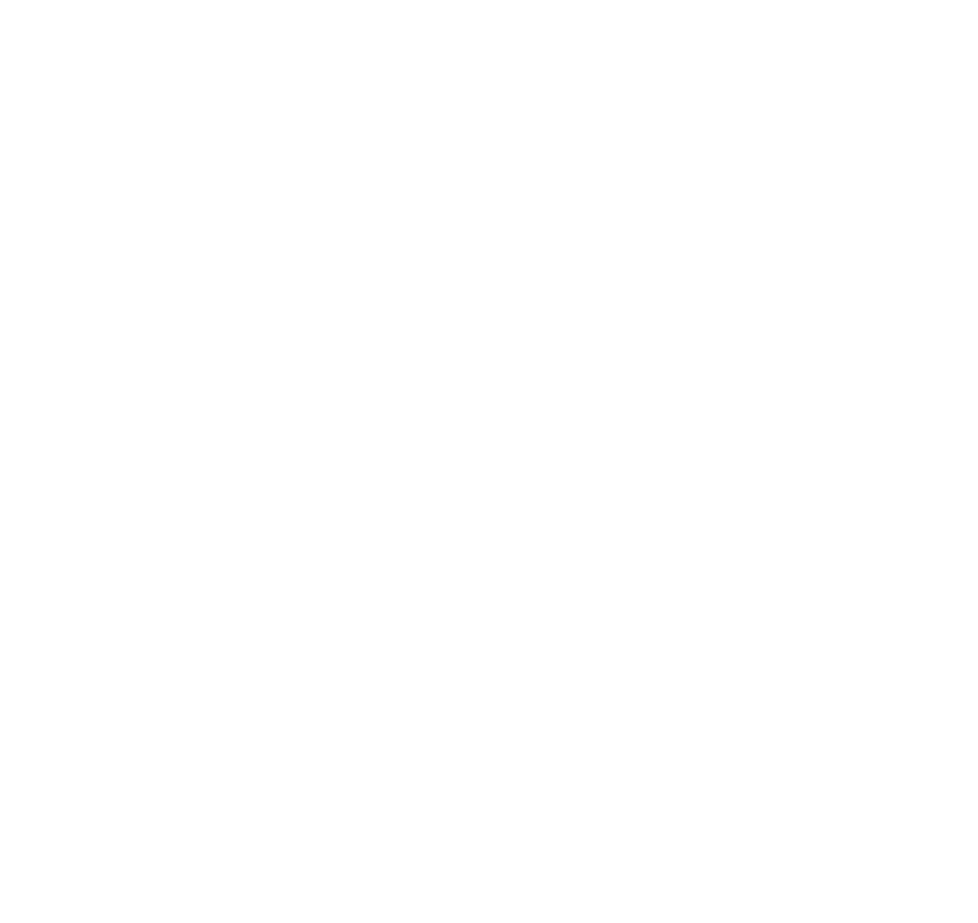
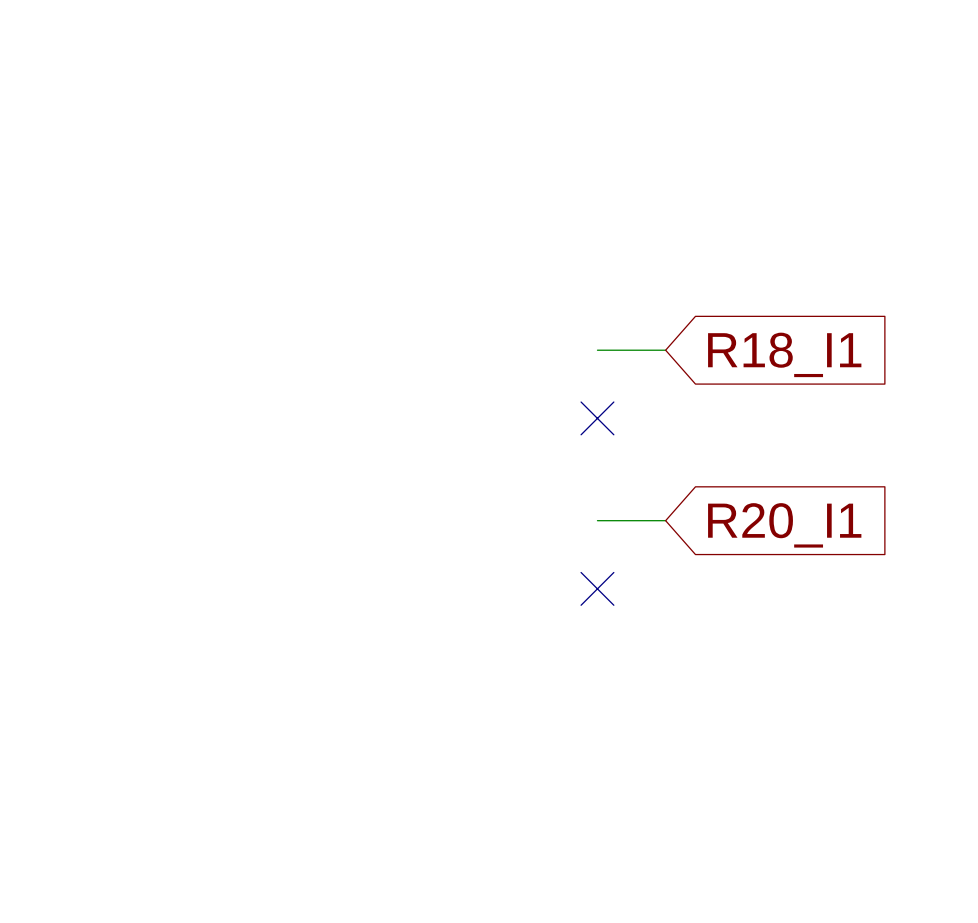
wire: none -> (597, 350) (665, 350)
global label: none -> R18_I1 (784, 354)
no-connect mark: none -> (597, 418)
wire: none -> (597, 520) (665, 520)
global label: none -> R20_I1 (784, 525)
no-connect mark: none -> (597, 588)

